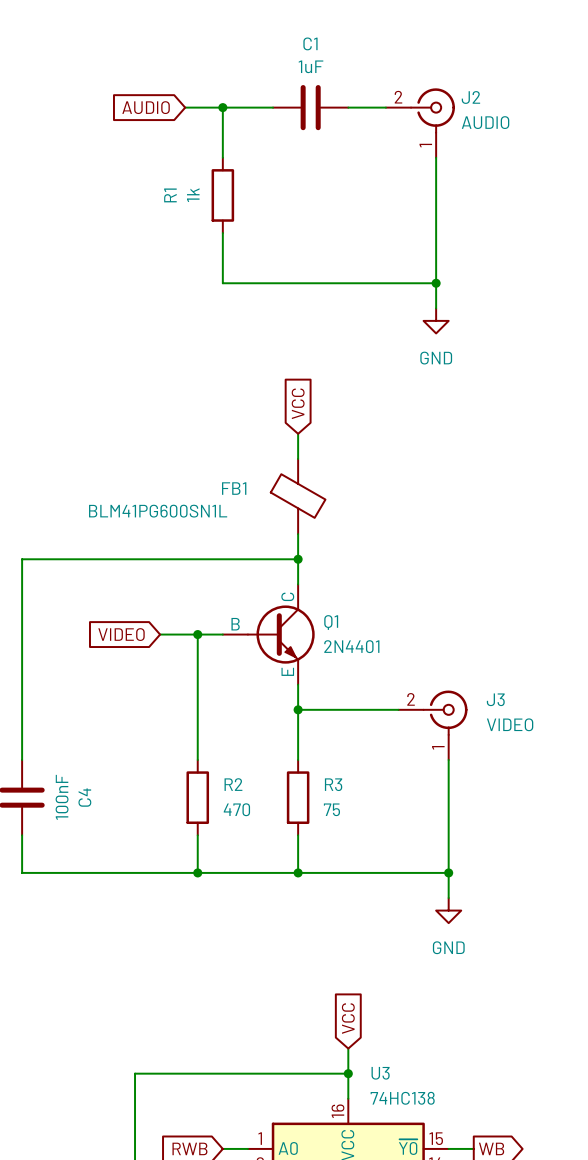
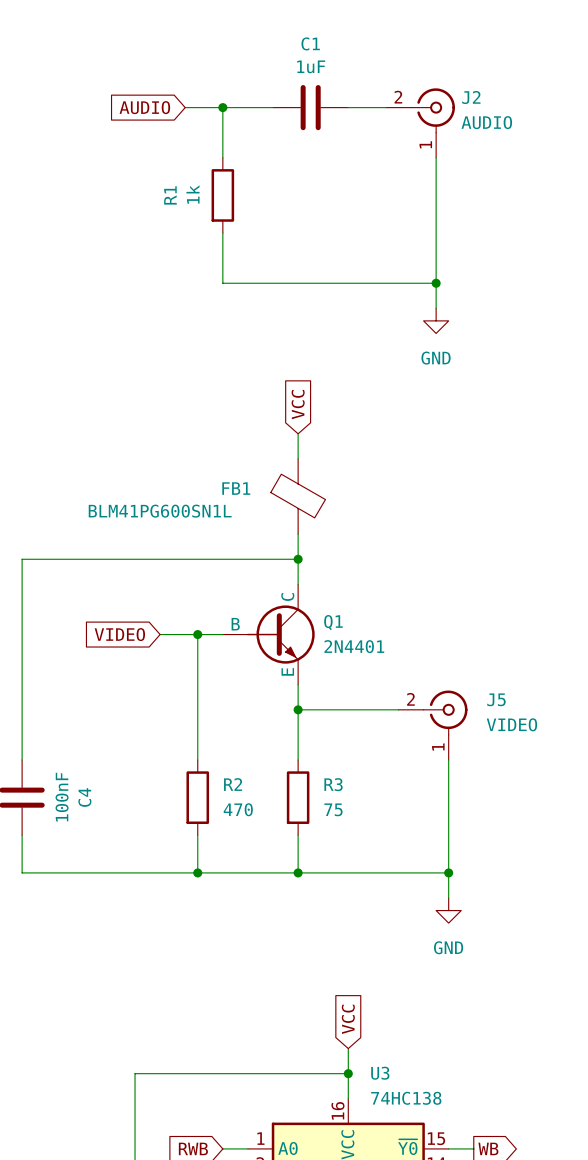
J3 name: J3 (495, 699) -> J5 (496, 699)

